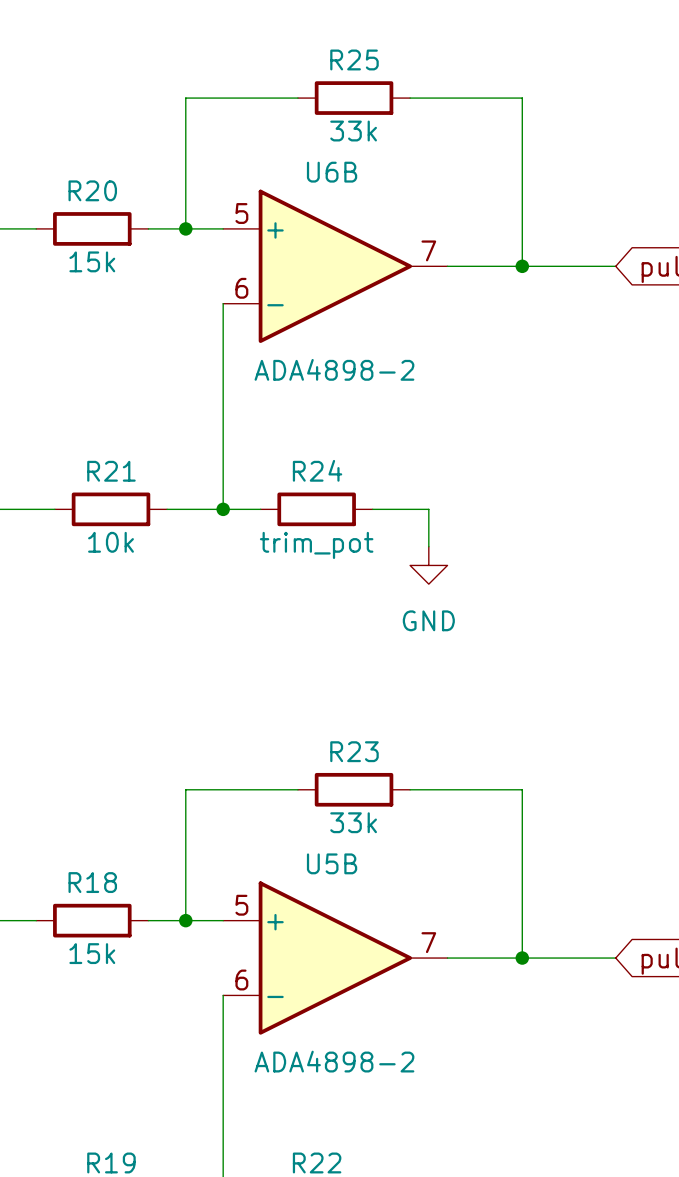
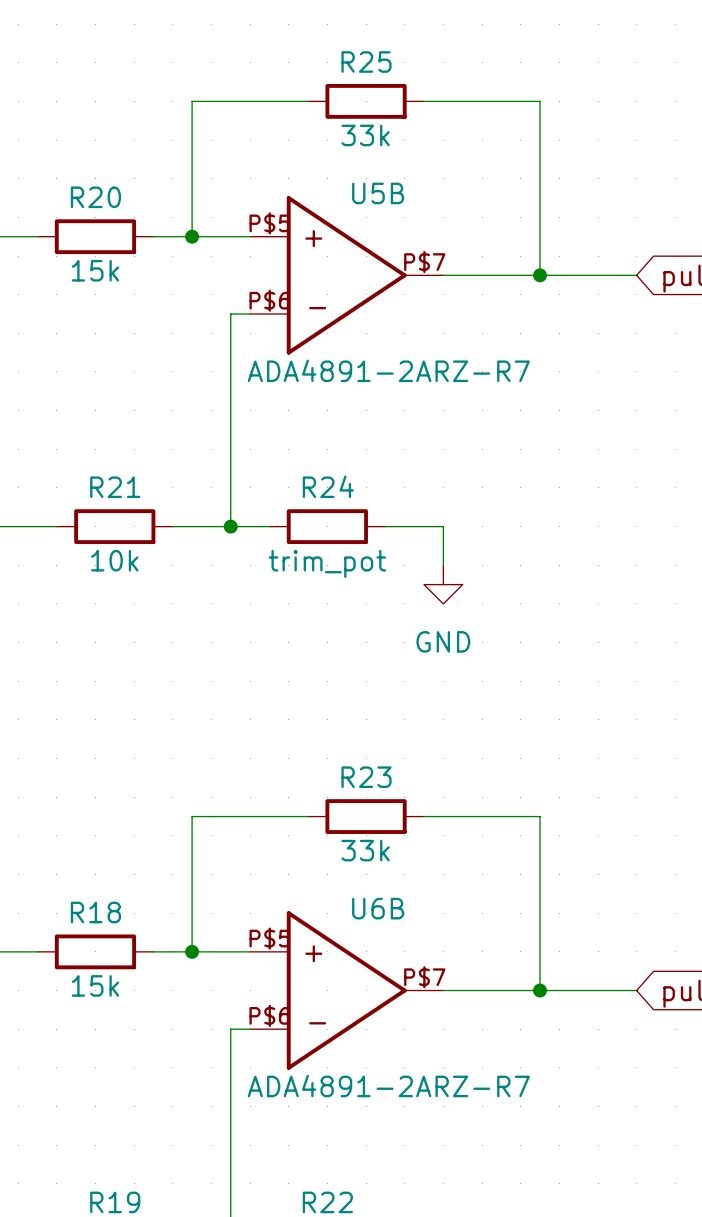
U6B name position: U6B (332, 172) -> U6B (378, 908)
U6B symbol: [223, 189, 448, 343] -> [250, 911, 444, 1070]
U6B value: ADA4898-2 (334, 369) -> ADA4891-2ARZ-R7 (388, 1085)
U5B name position: U5B (332, 863) -> U5B (378, 193)
U5B symbol: [223, 881, 448, 1035] -> [250, 196, 444, 355]
U5B value: ADA4898-2 (334, 1061) -> ADA4891-2ARZ-R7 (388, 370)

